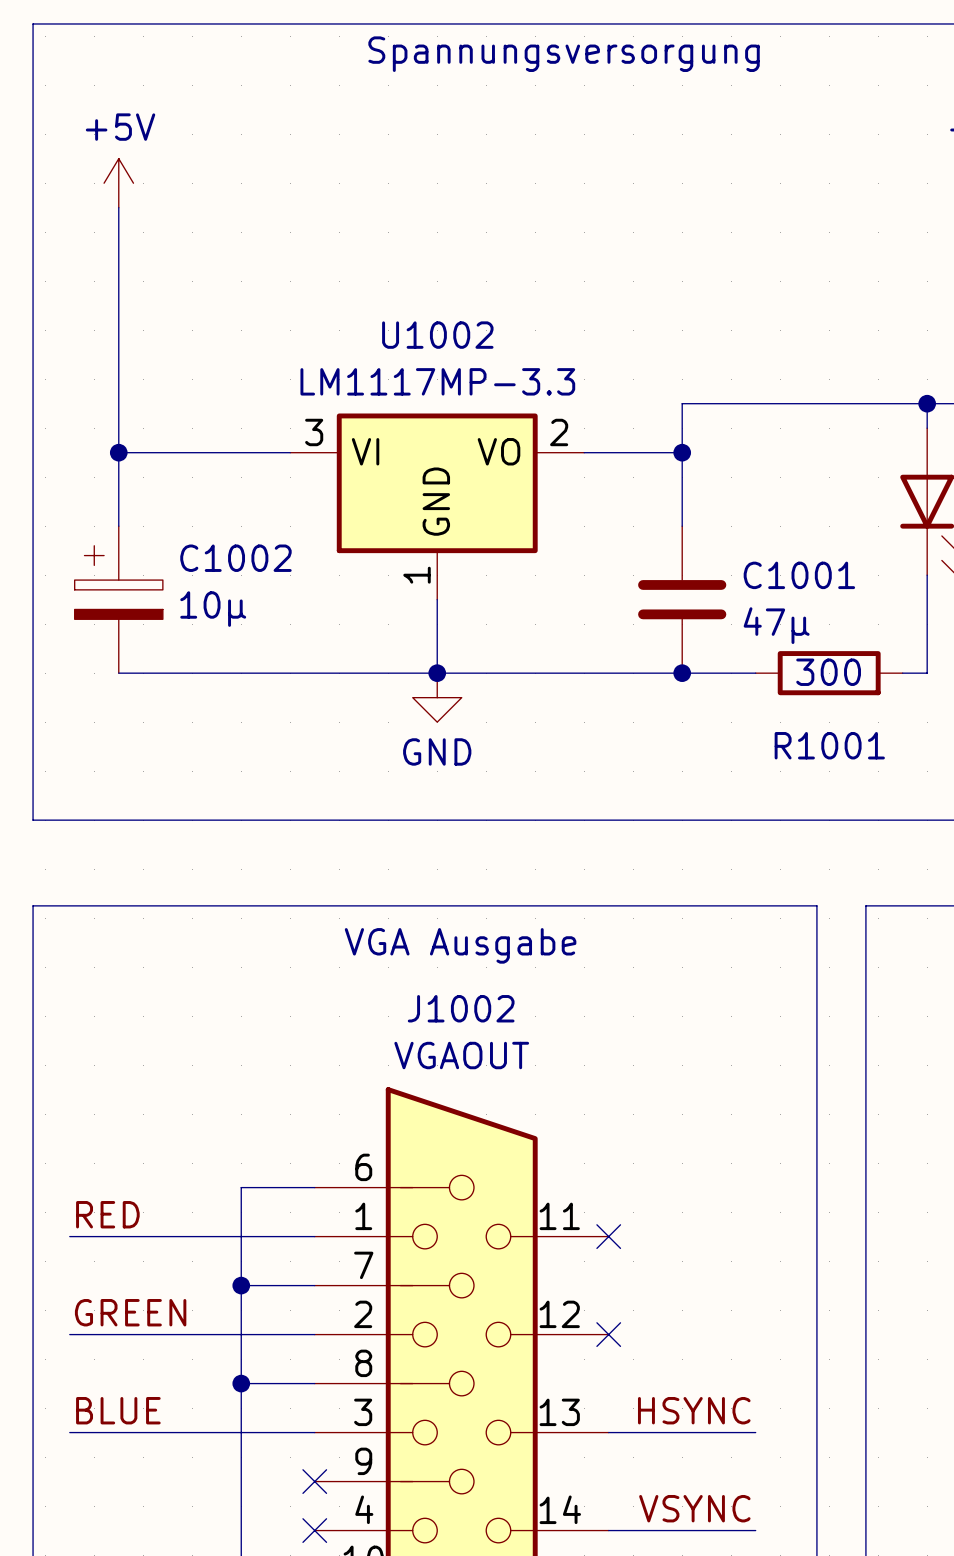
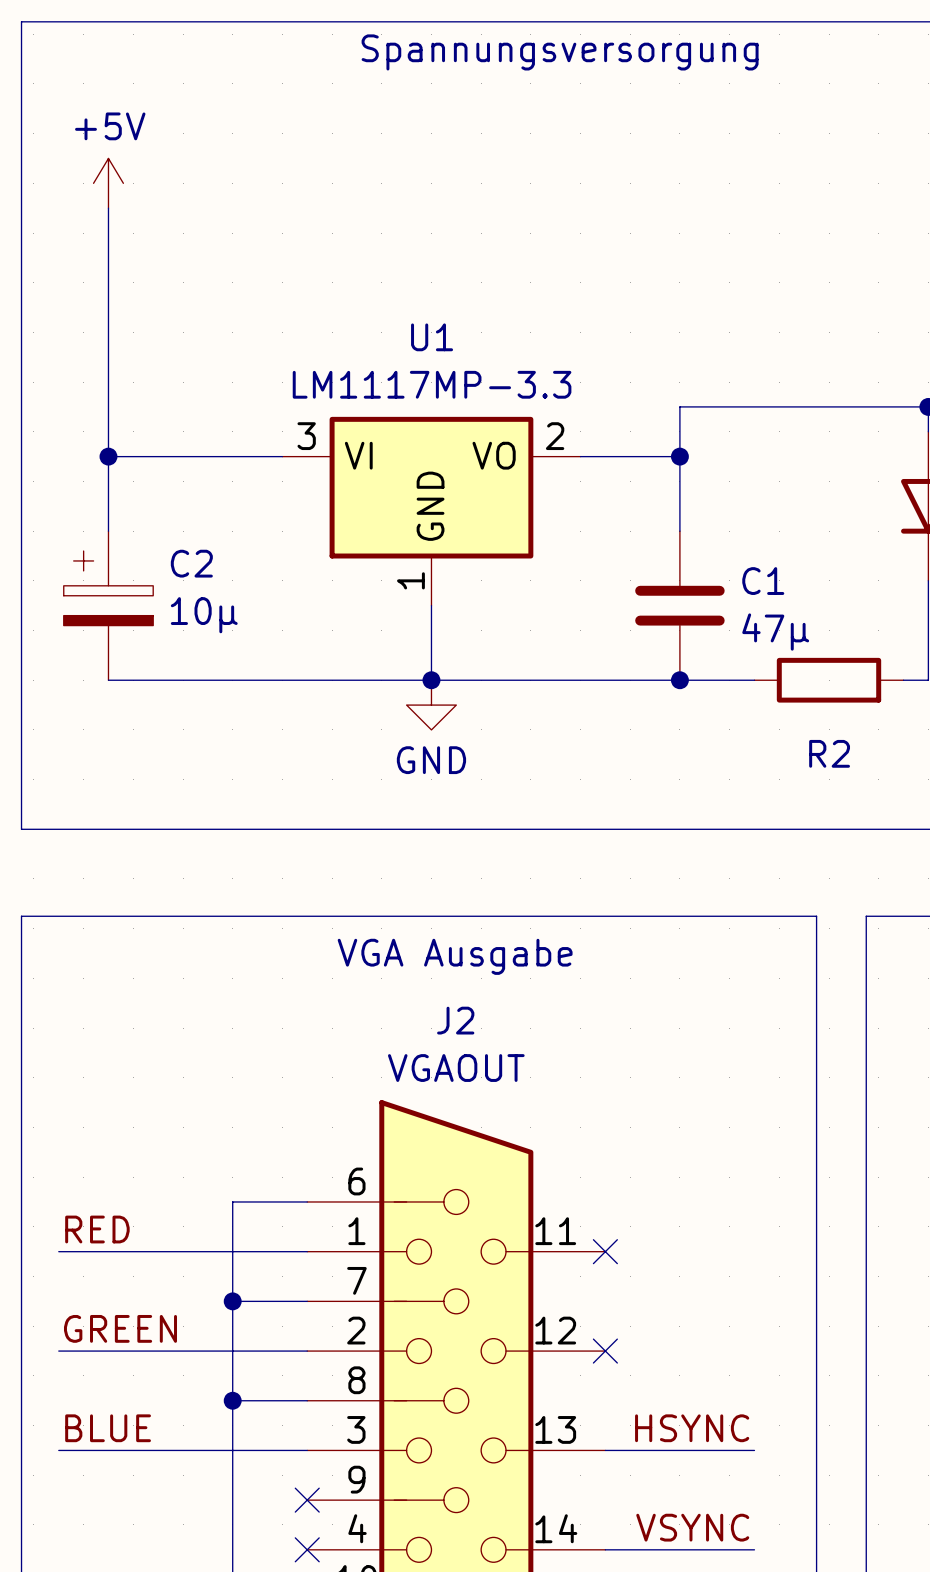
U1002 name: U1002 (437, 335) -> U1 (432, 337)
C1002 name: C1002 (235, 558) -> C2 (191, 563)
C1001 name: C1001 (799, 575) -> C1 (763, 581)
R1001 value: 300 (828, 672) -> none
R1001 name: R1001 (829, 745) -> R2 (829, 753)
J1002 name: J1002 (461, 1008) -> J2 (455, 1020)

